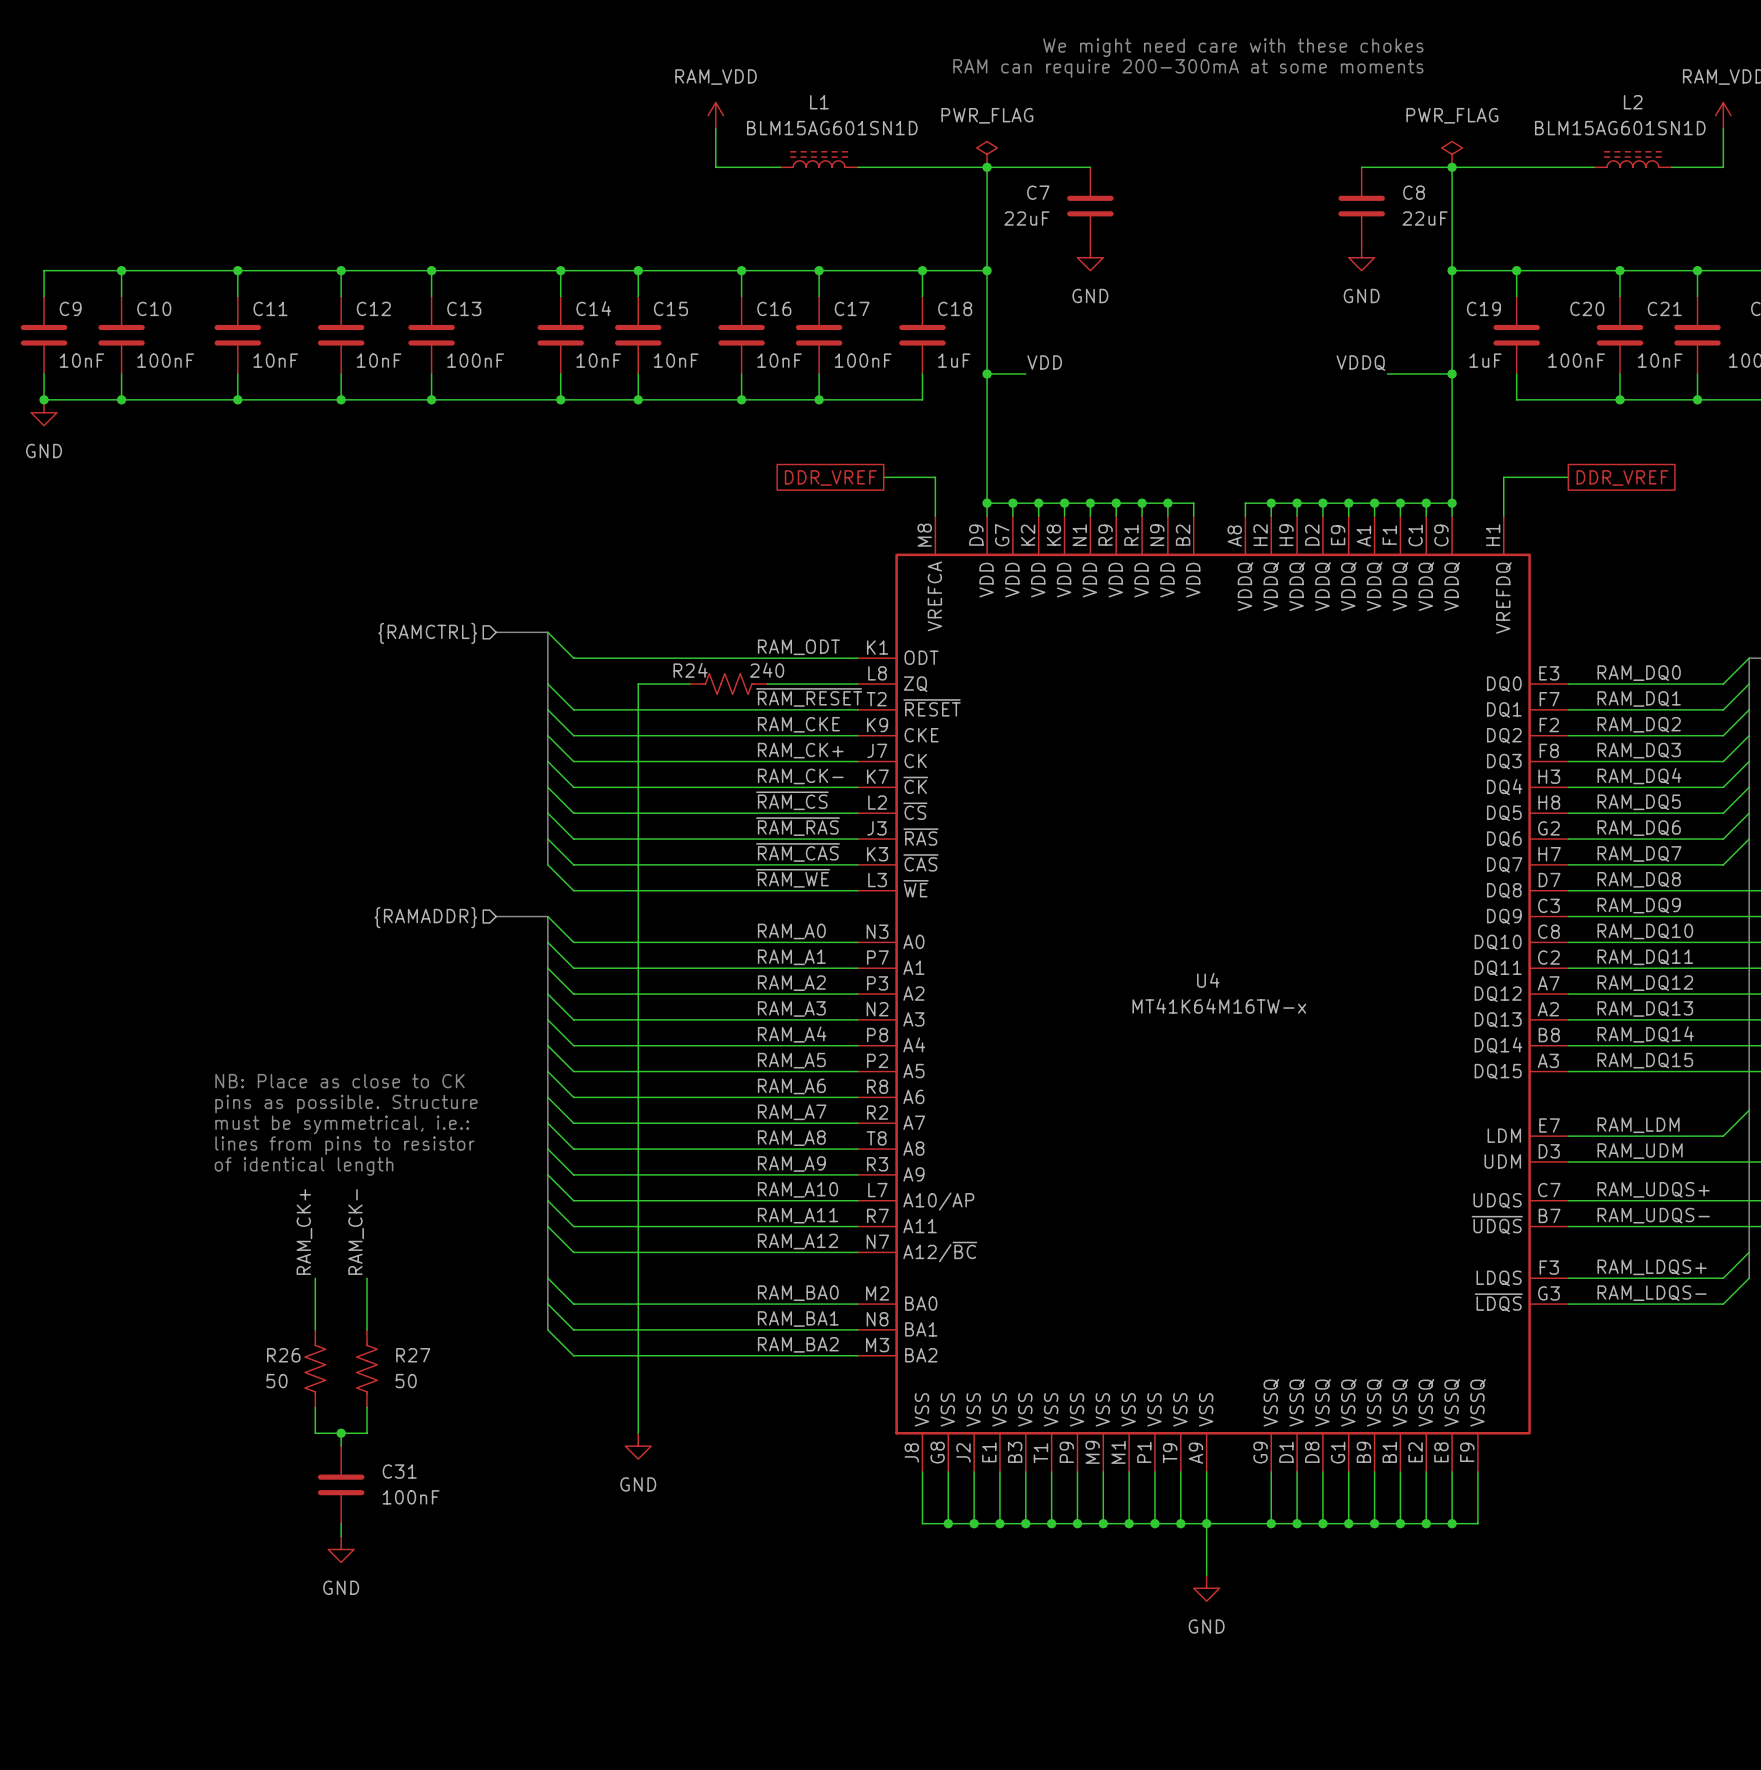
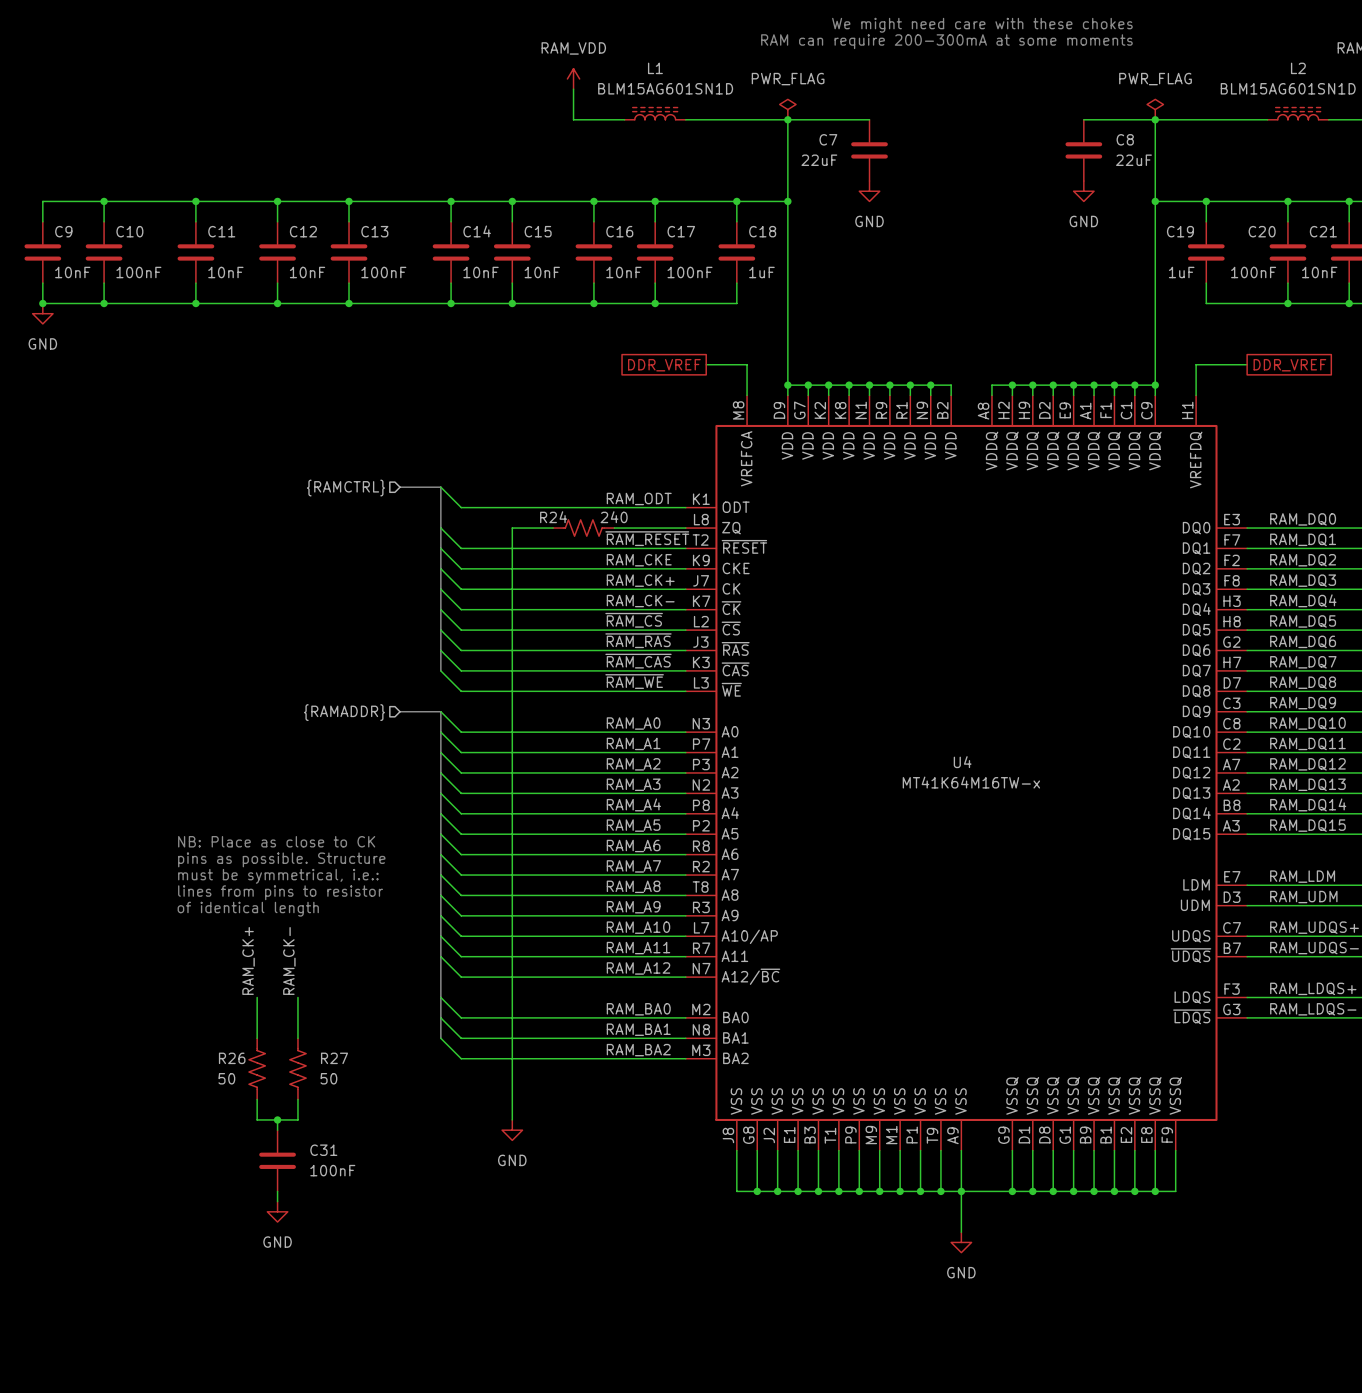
label: VDD (1044, 362) -> none
label: VDDQ (1360, 363) -> none
wire: (987, 374) (1025, 374) -> none
junction: (987, 374) -> none
wire: (1387, 374) (1452, 374) -> none
junction: (1452, 374) -> none

